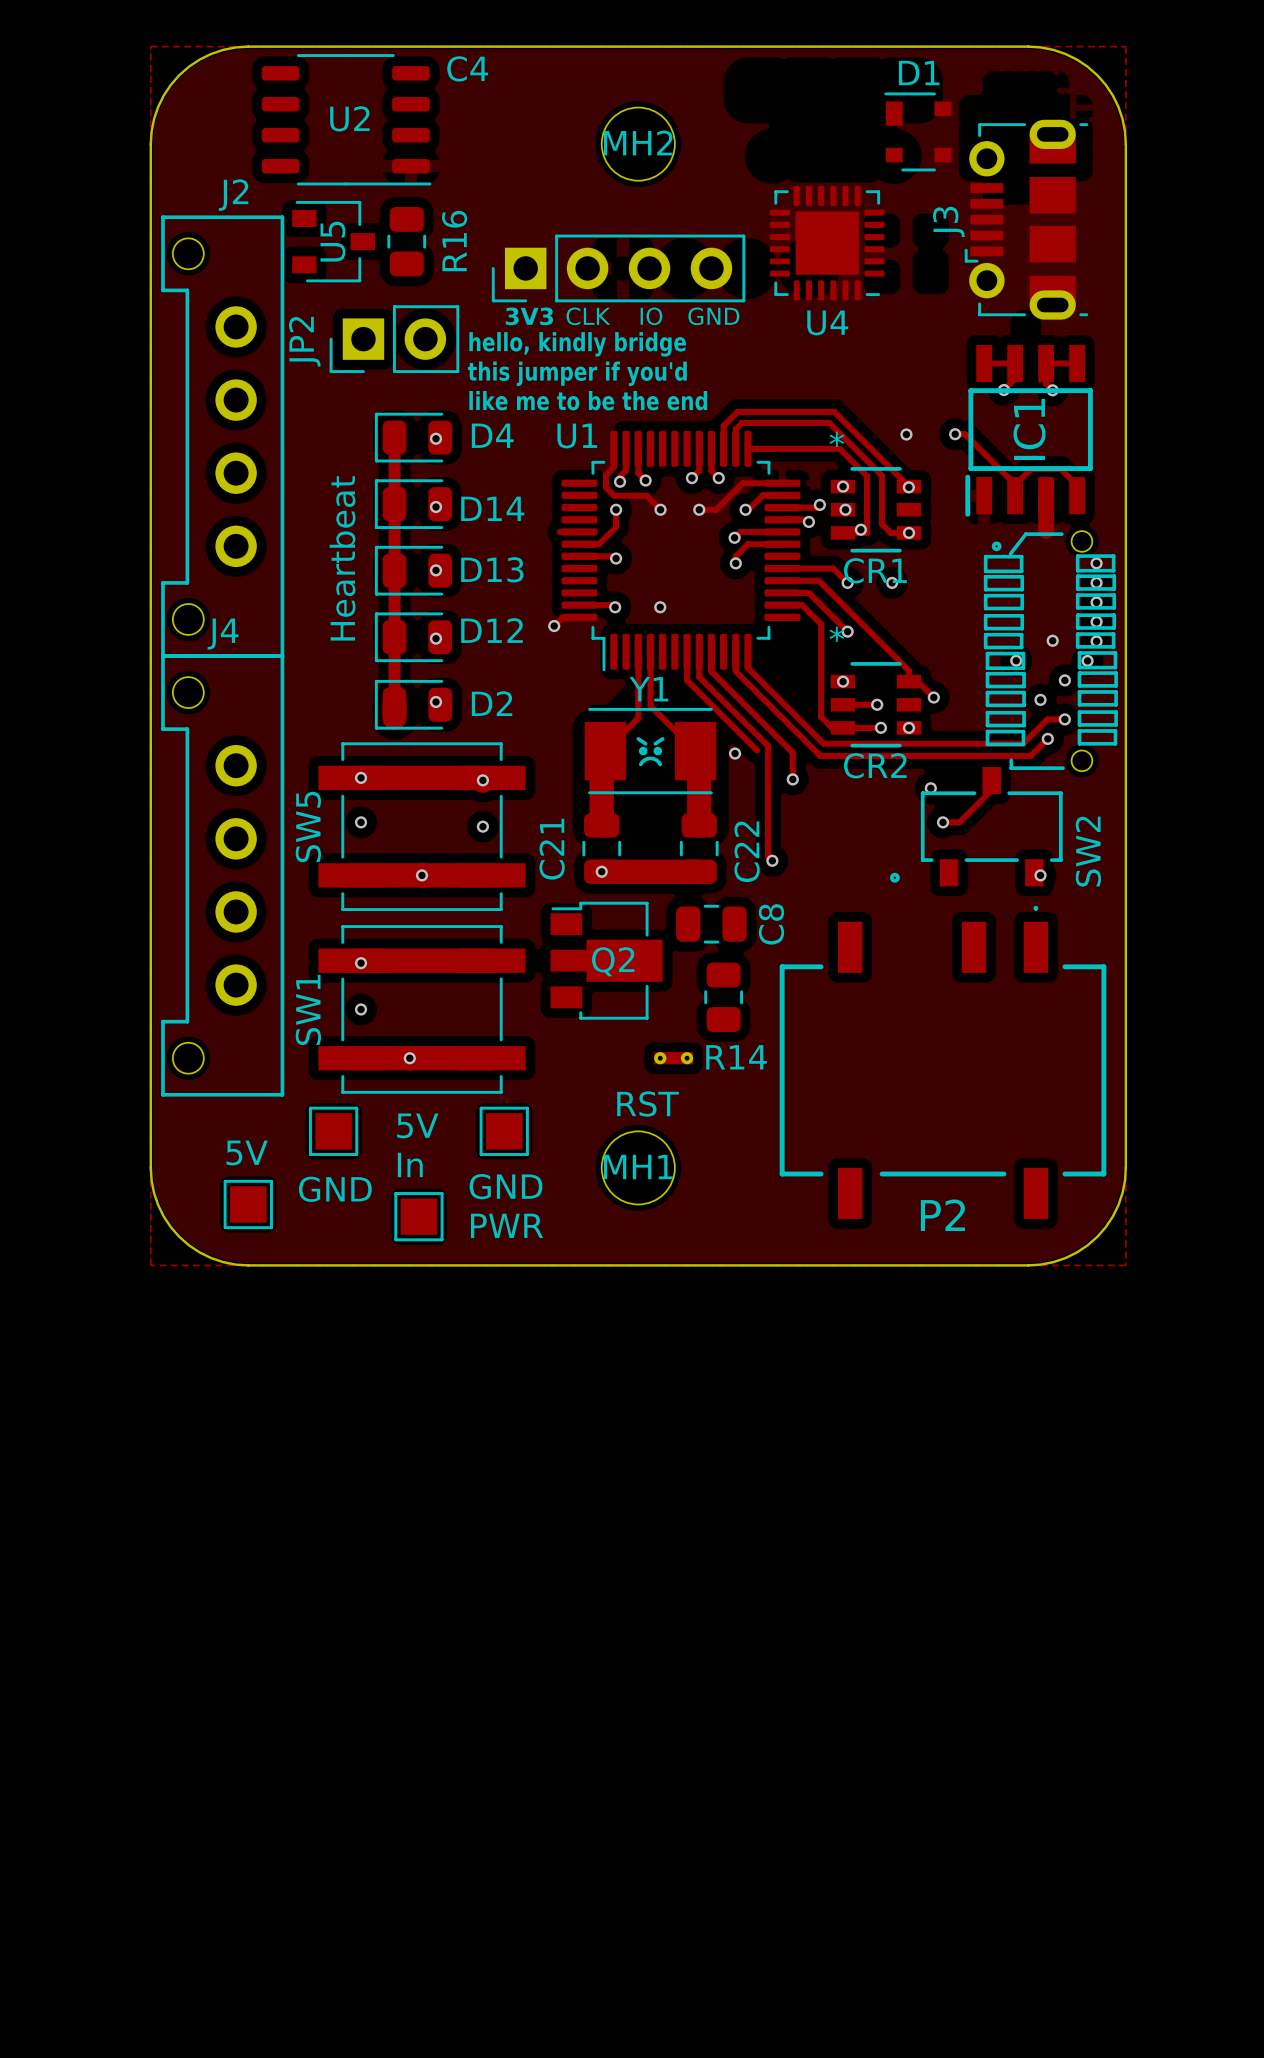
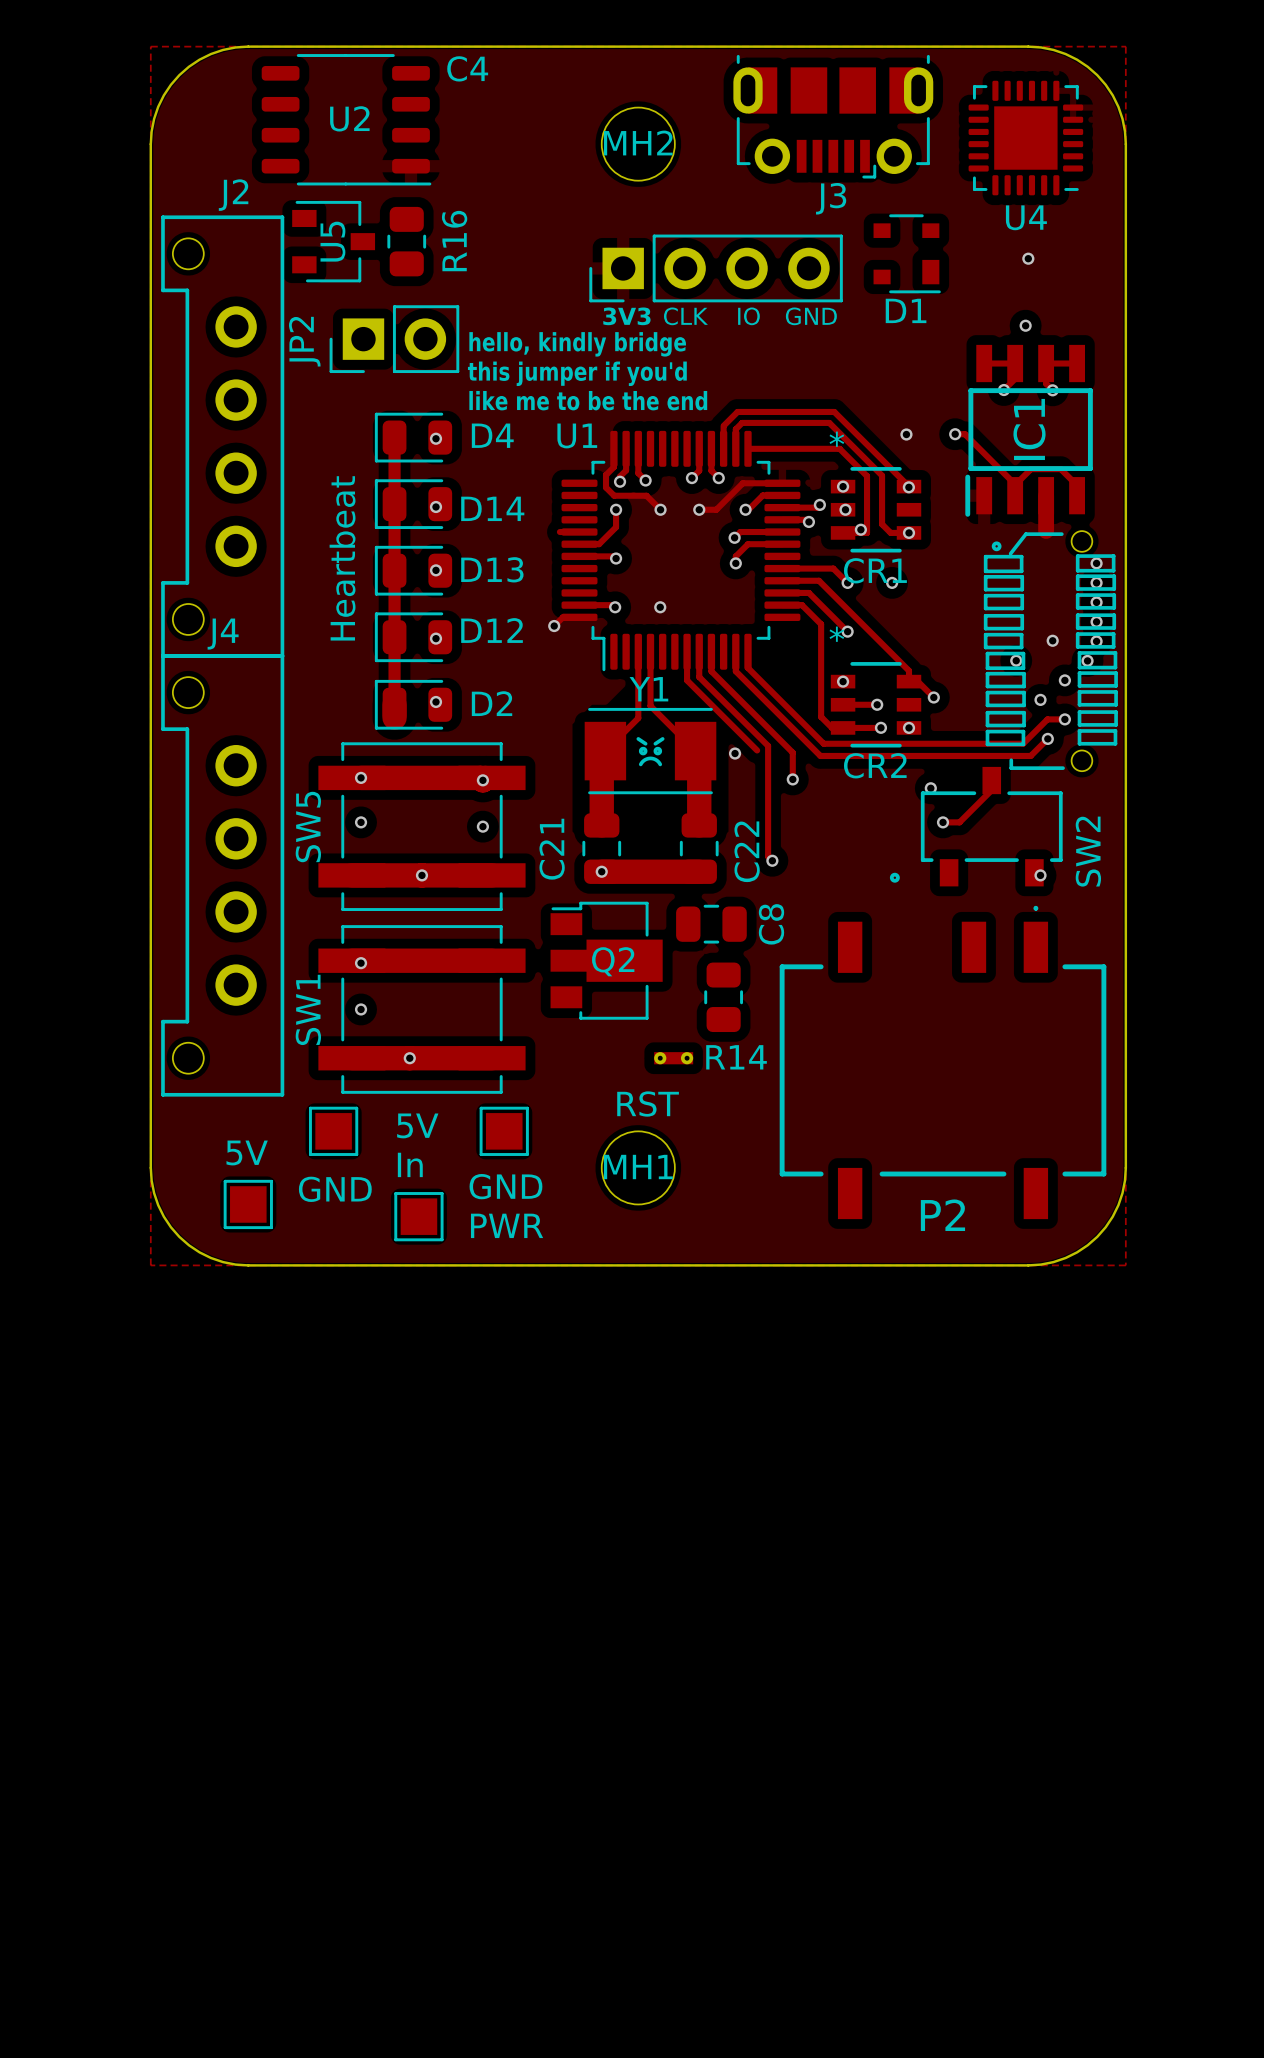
D1 rotation: 0° (917, 131) -> 180° (907, 253)
D1 position: (917, 131) -> (907, 253)
J3 rotation: 0° (1026, 219) -> 90° counterclockwise (833, 116)
J3 position: (1026, 219) -> (833, 116)
U4 position: (827, 243) -> (1025, 138)
via: none -> (1028, 258)
part position: (618, 268) -> (716, 268)
text position: 3V3 (529, 316) -> 3V3 (626, 316)
text position: CLK (588, 316) -> CLK (685, 316)
text position: IO (651, 316) -> IO (748, 316)
text position: GND (713, 316) -> GND (811, 316)
via: none -> (1025, 325)

